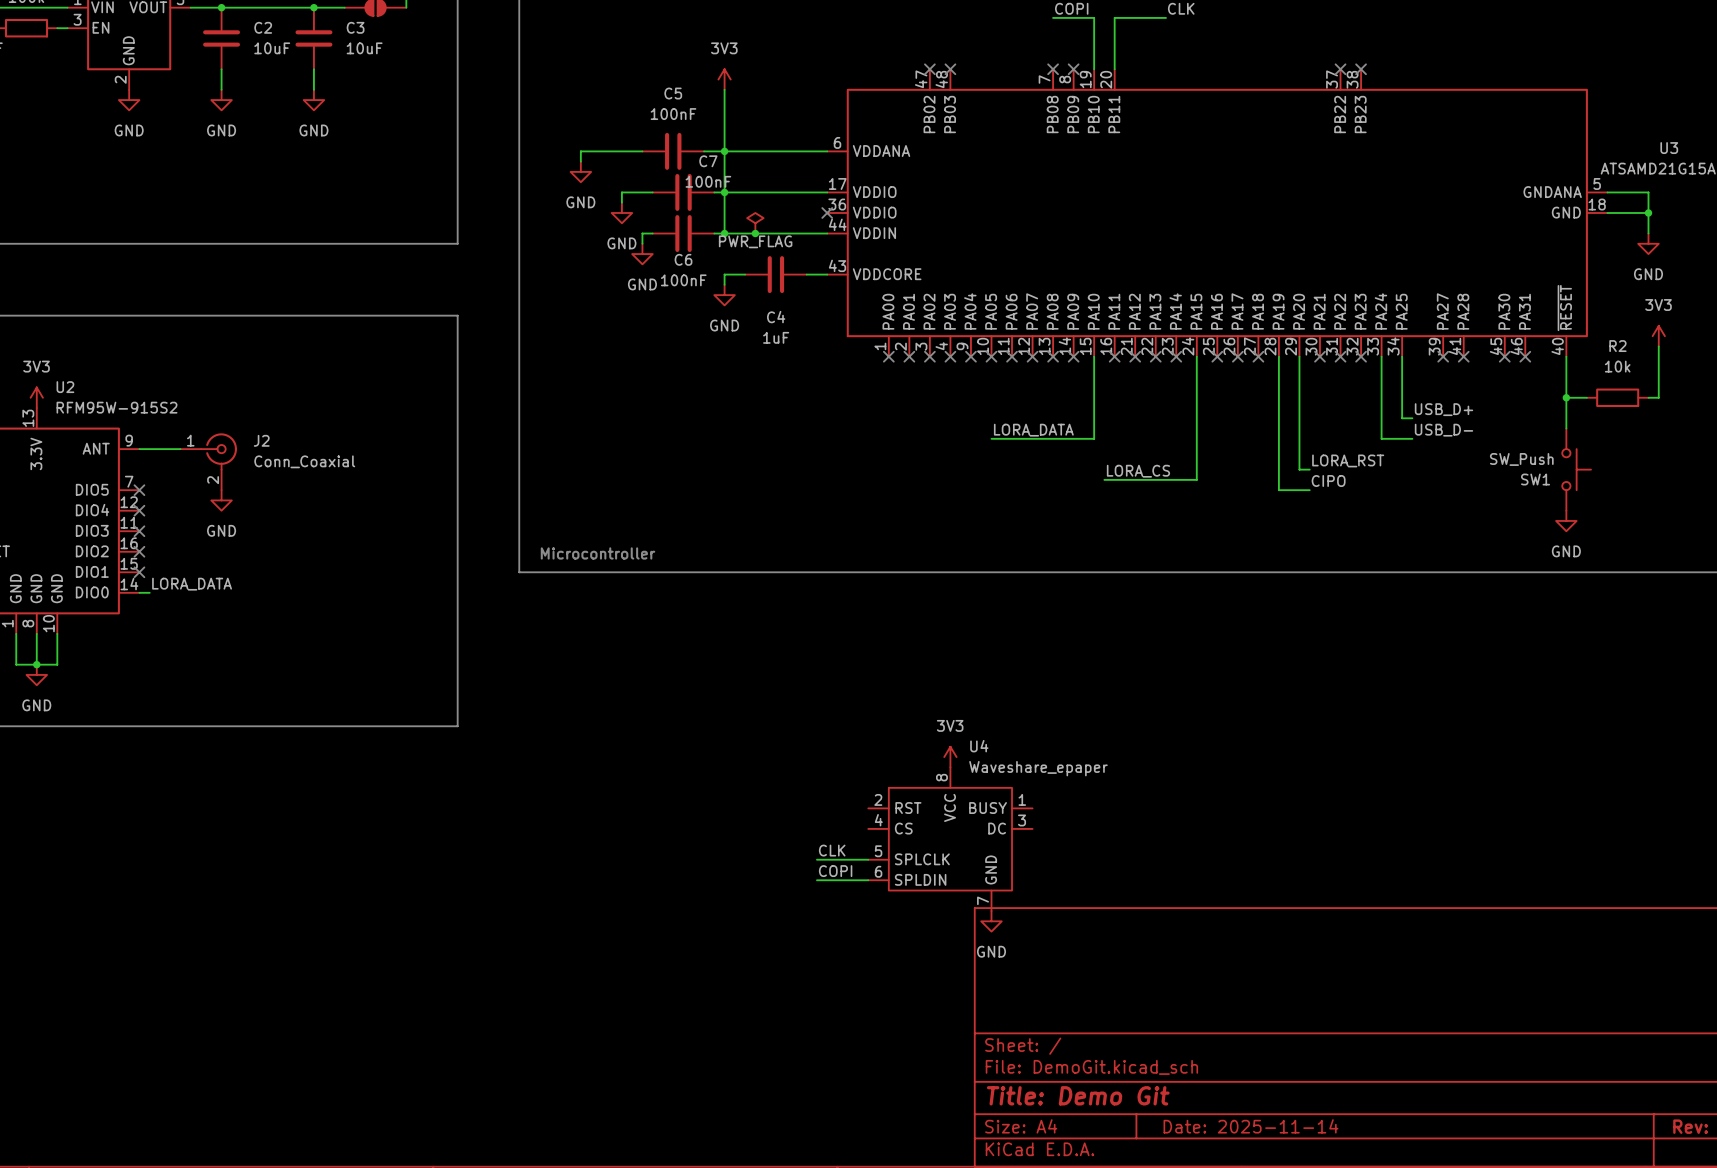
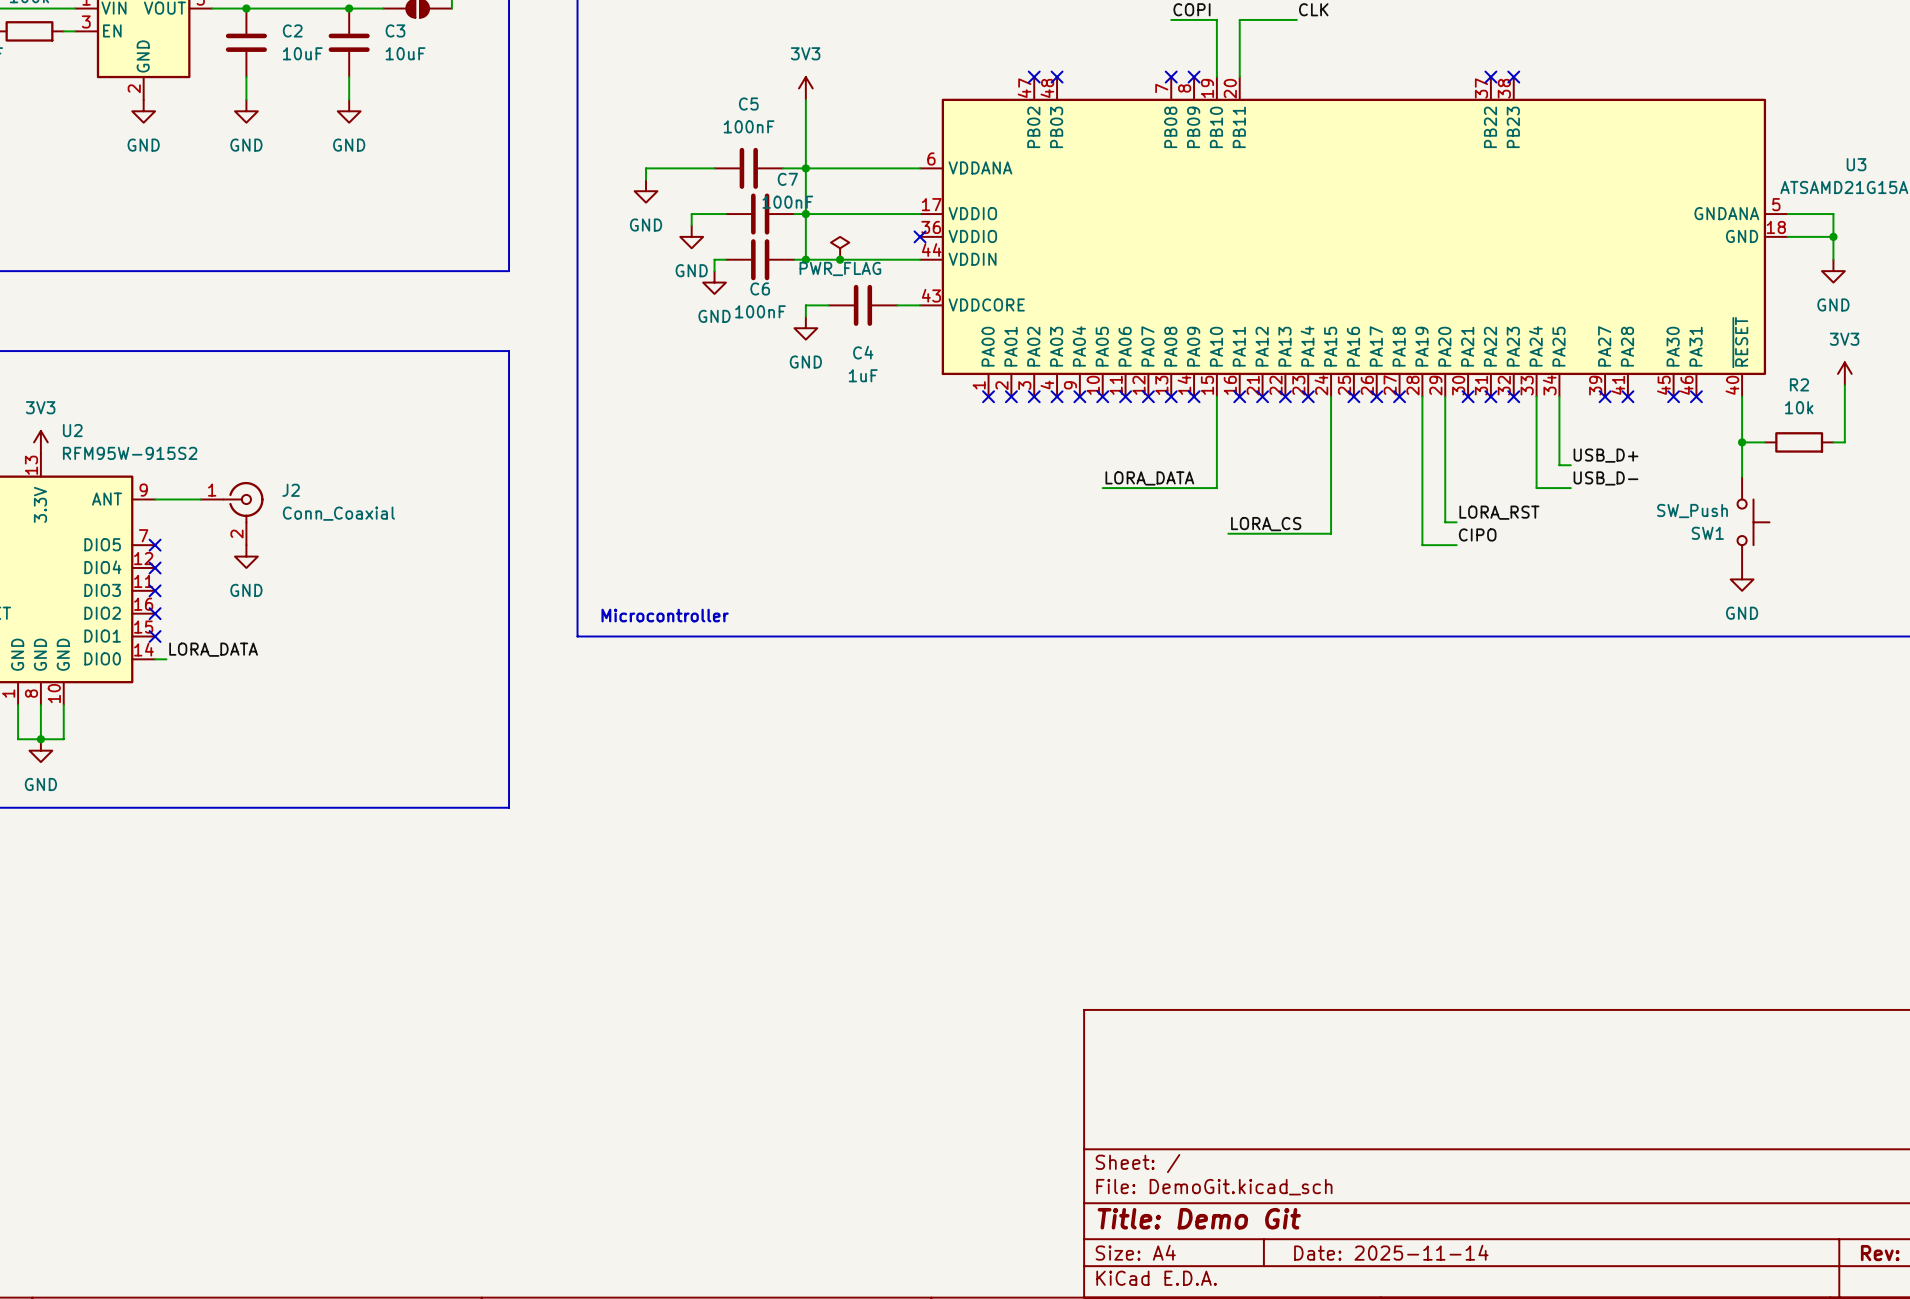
power symbol: 3V3 (950, 757) -> none
U4: Waveshare_epaper (950, 839) -> none
label: CLK (832, 850) -> none
wire: (816, 859) (868, 859) -> none
label: COPI (835, 871) -> none
wire: (816, 880) (868, 880) -> none
power symbol: GND (991, 921) -> none

